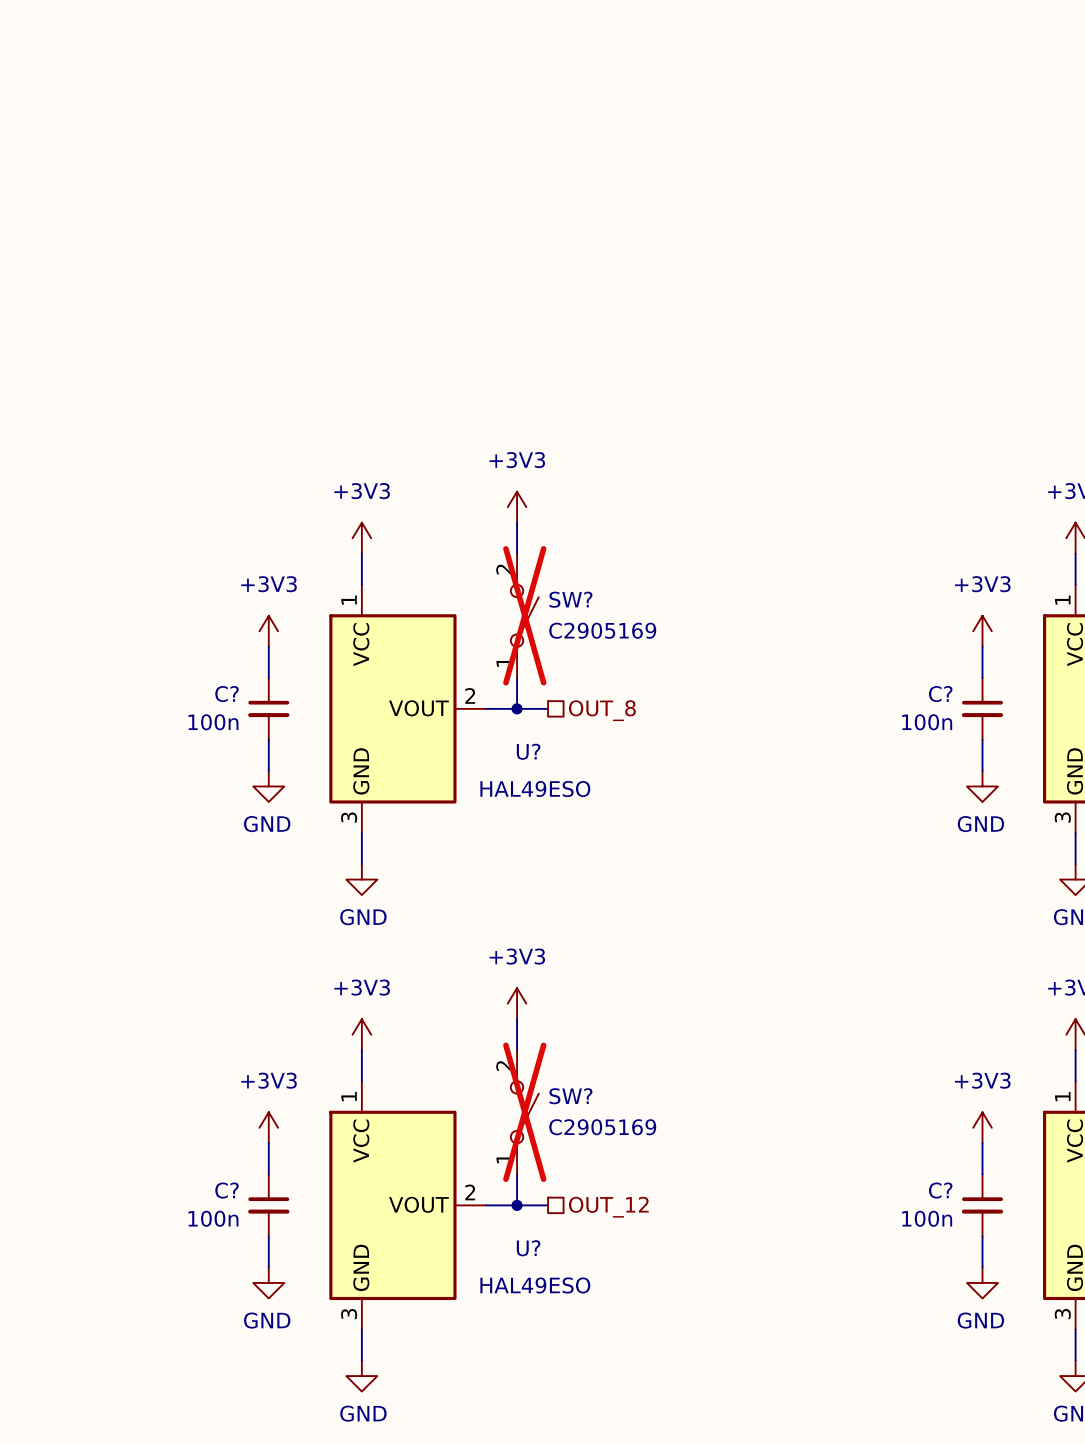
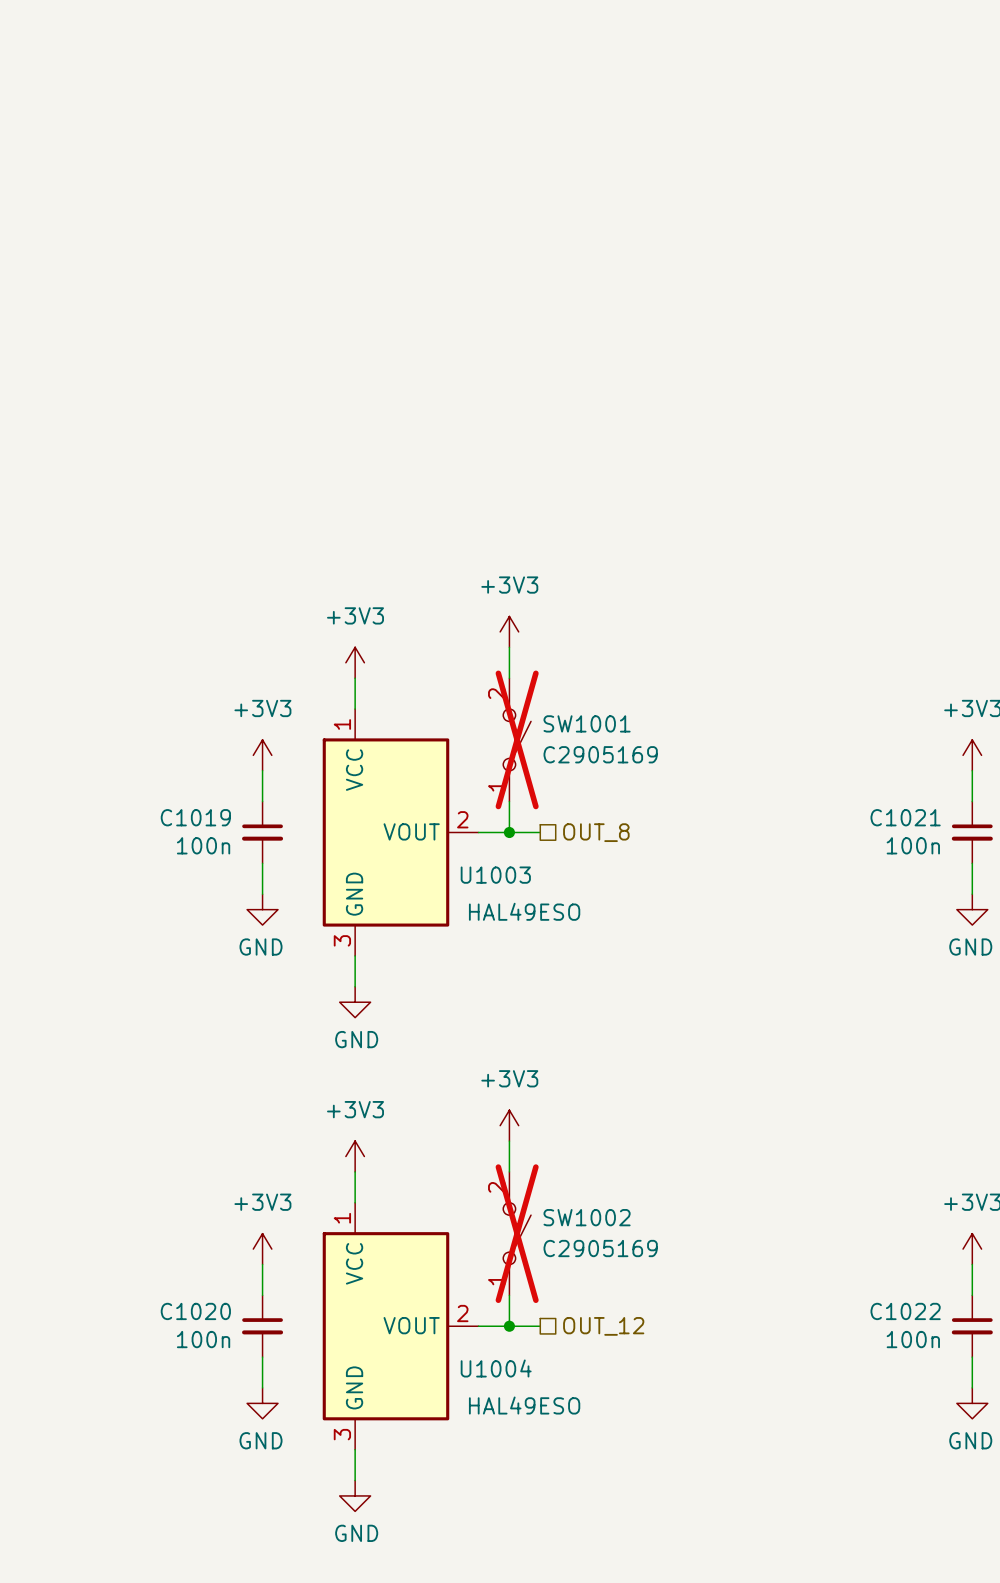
SW? name: SW? (570, 599) -> SW1001 (587, 723)
C? name: C? (227, 694) -> C1019 (195, 817)
C? name: C? (940, 694) -> C1021 (905, 817)
U? name: U? (528, 751) -> U1003 (495, 875)
SW? name: SW? (570, 1096) -> SW1002 (587, 1217)
C? name: C? (227, 1190) -> C1020 (195, 1311)
C? name: C? (940, 1190) -> C1022 (905, 1311)
U? name: U? (528, 1248) -> U1004 (496, 1368)

